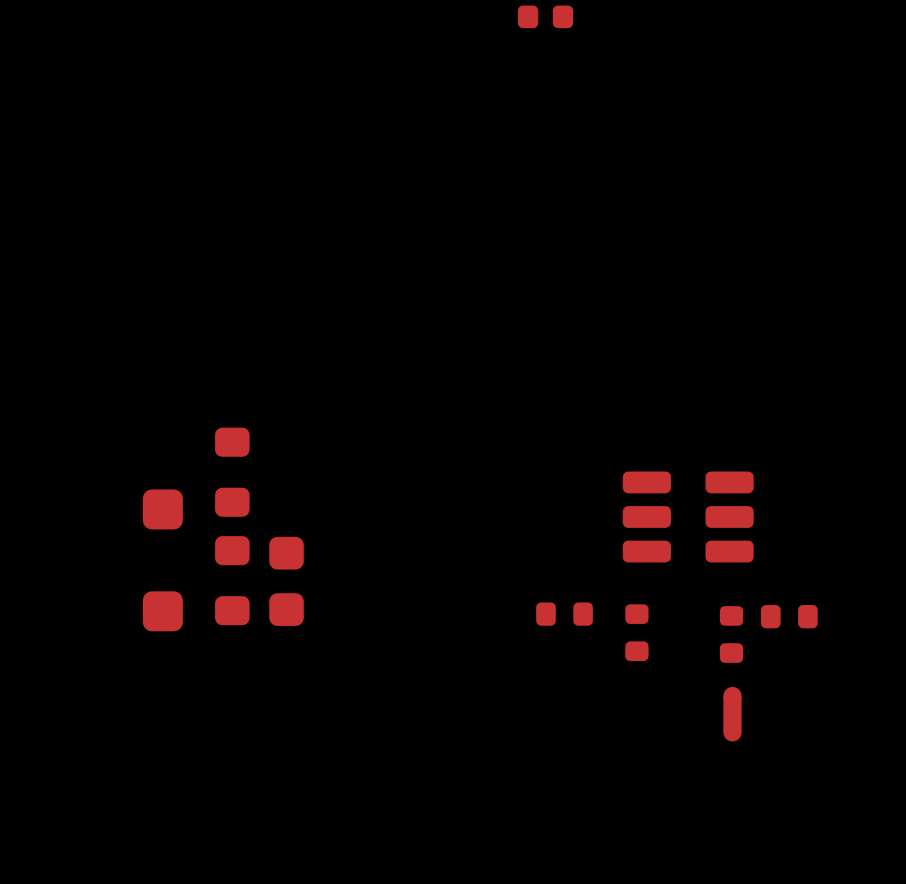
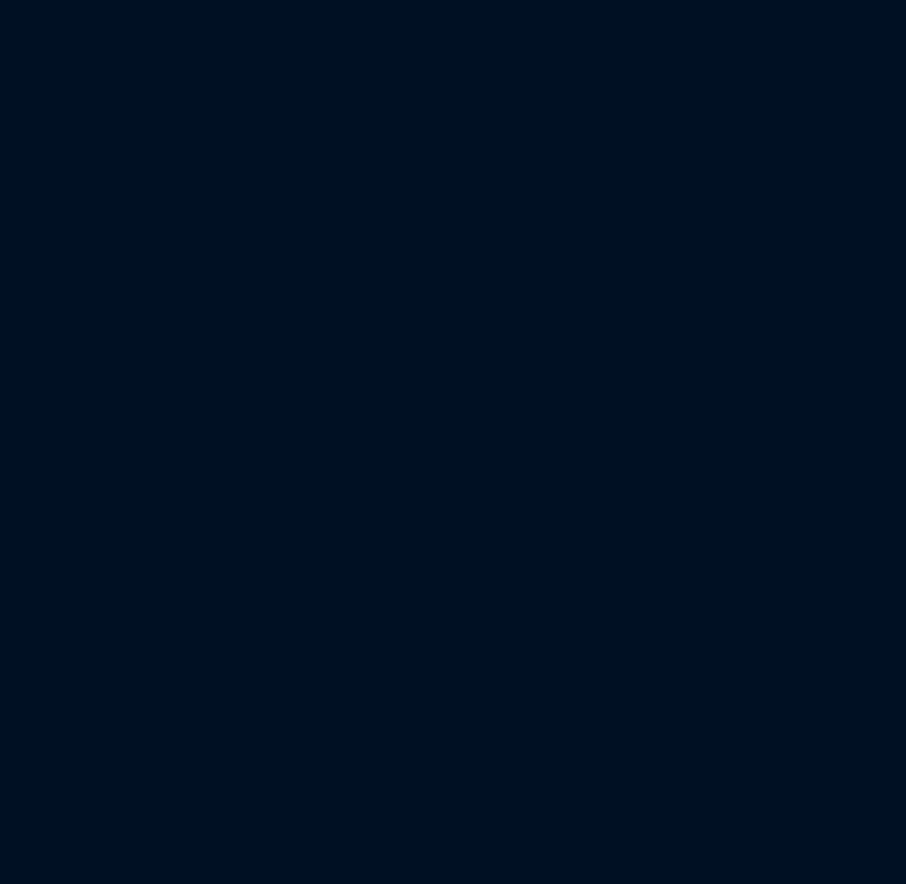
part: (545, 16) -> none
part: (232, 472) -> none
part: (688, 517) -> none
part: (162, 560) -> none
part: (232, 580) -> none
part: (286, 581) -> none
part: (564, 614) -> none
part: (789, 616) -> none
part: (636, 632) -> none
part: (731, 634) -> none
part: (732, 714) -> none

